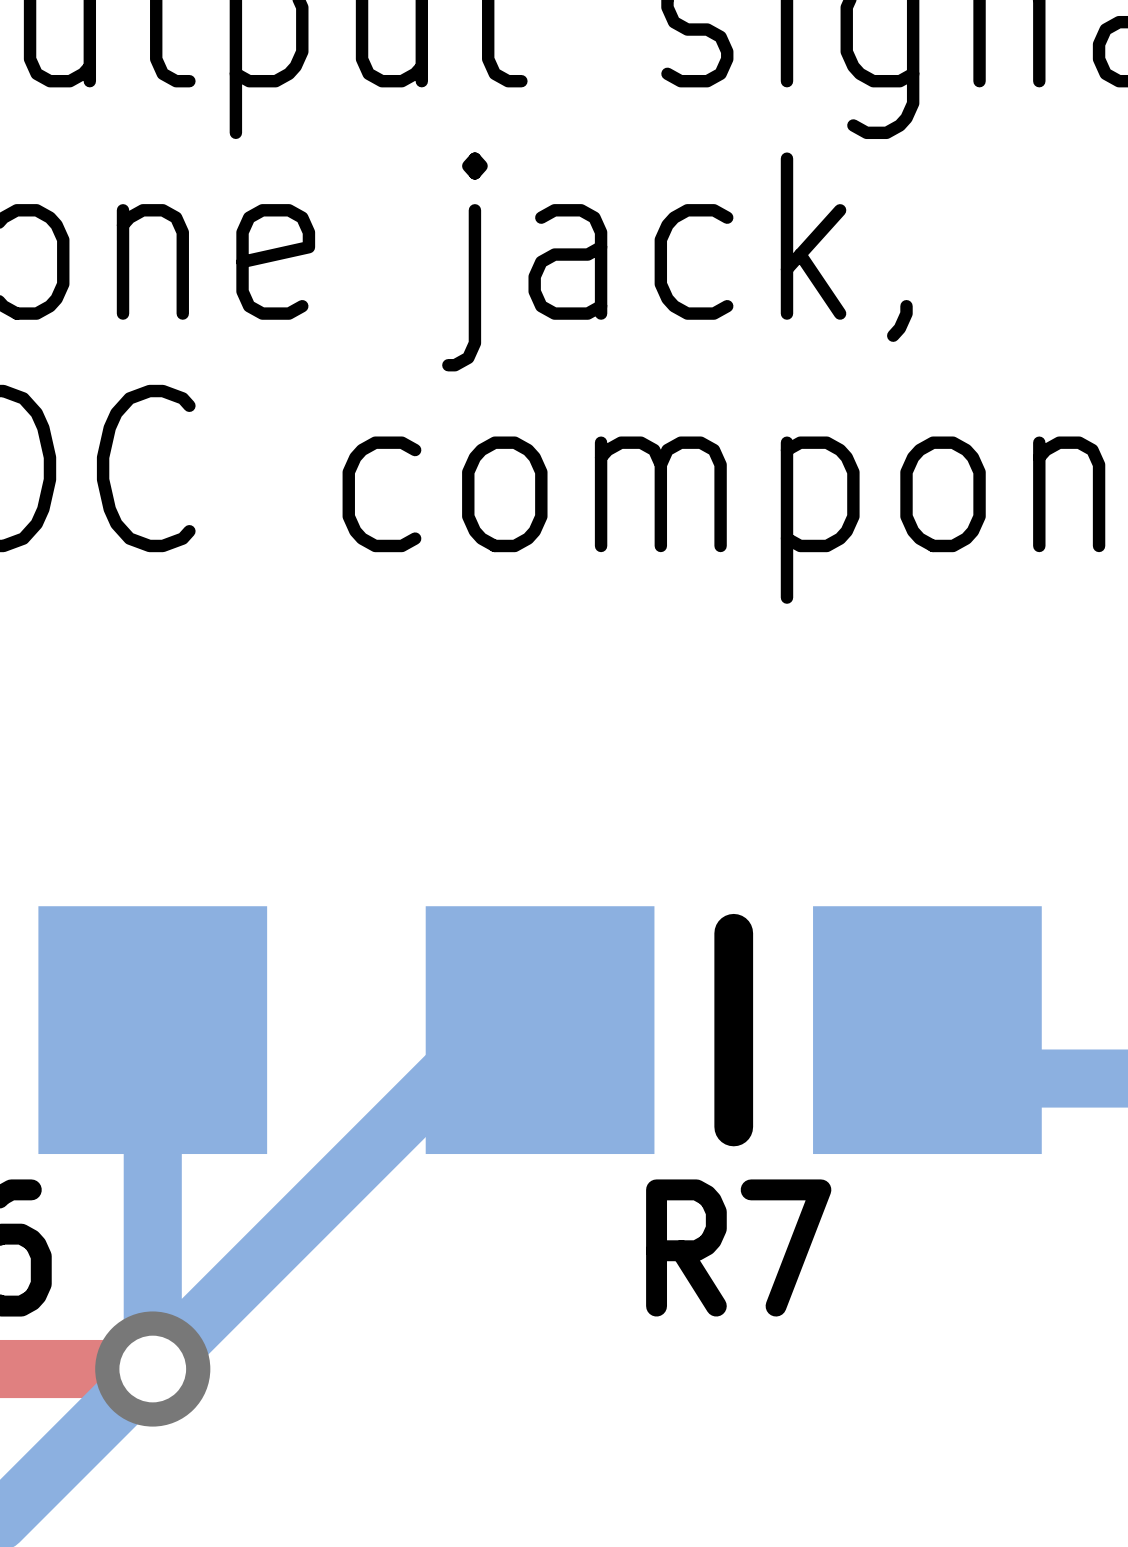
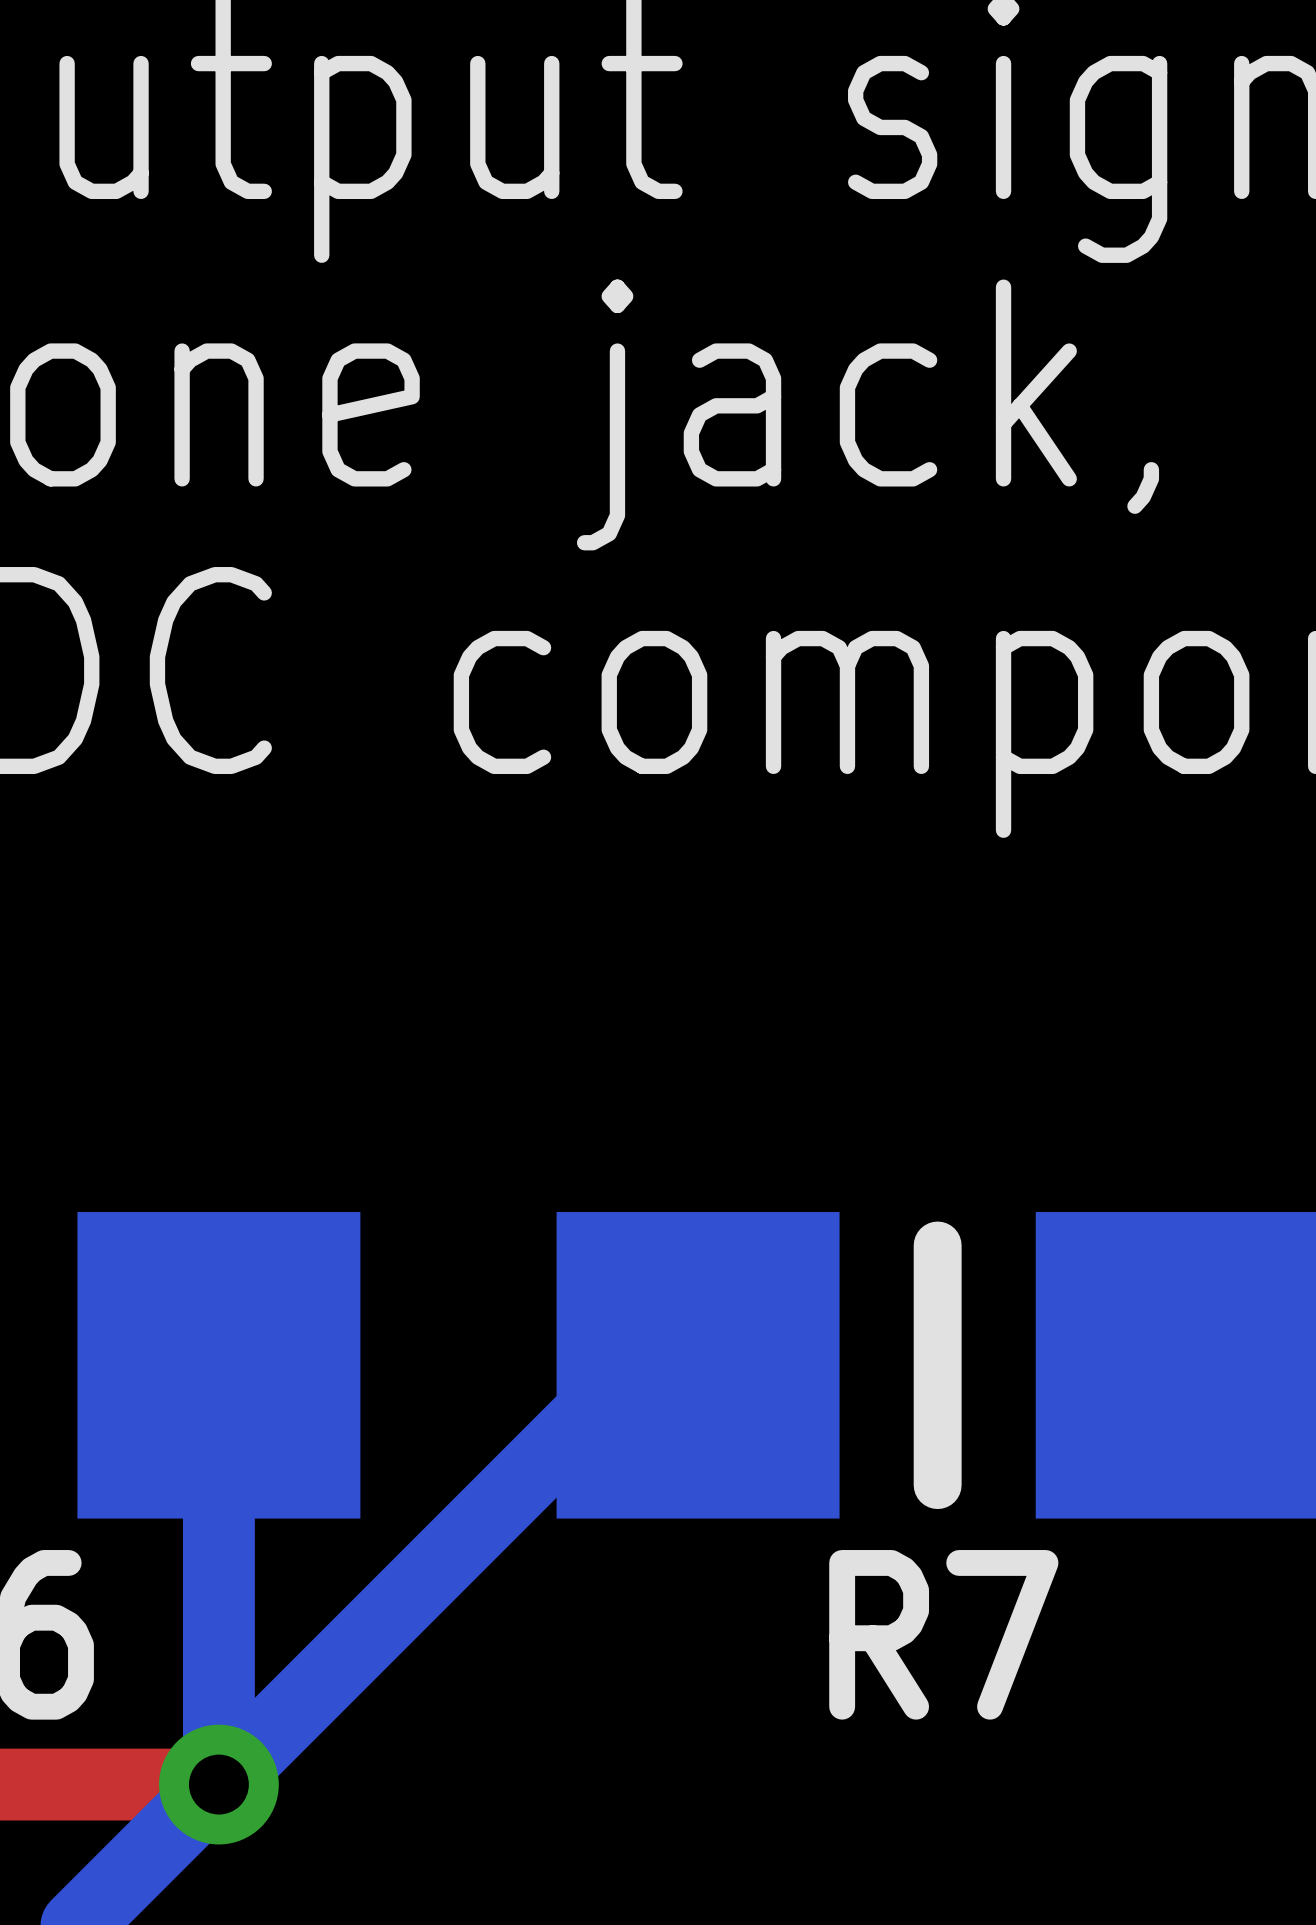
via size: [95, 1311, 211, 1427] -> [159, 1724, 279, 1845]

